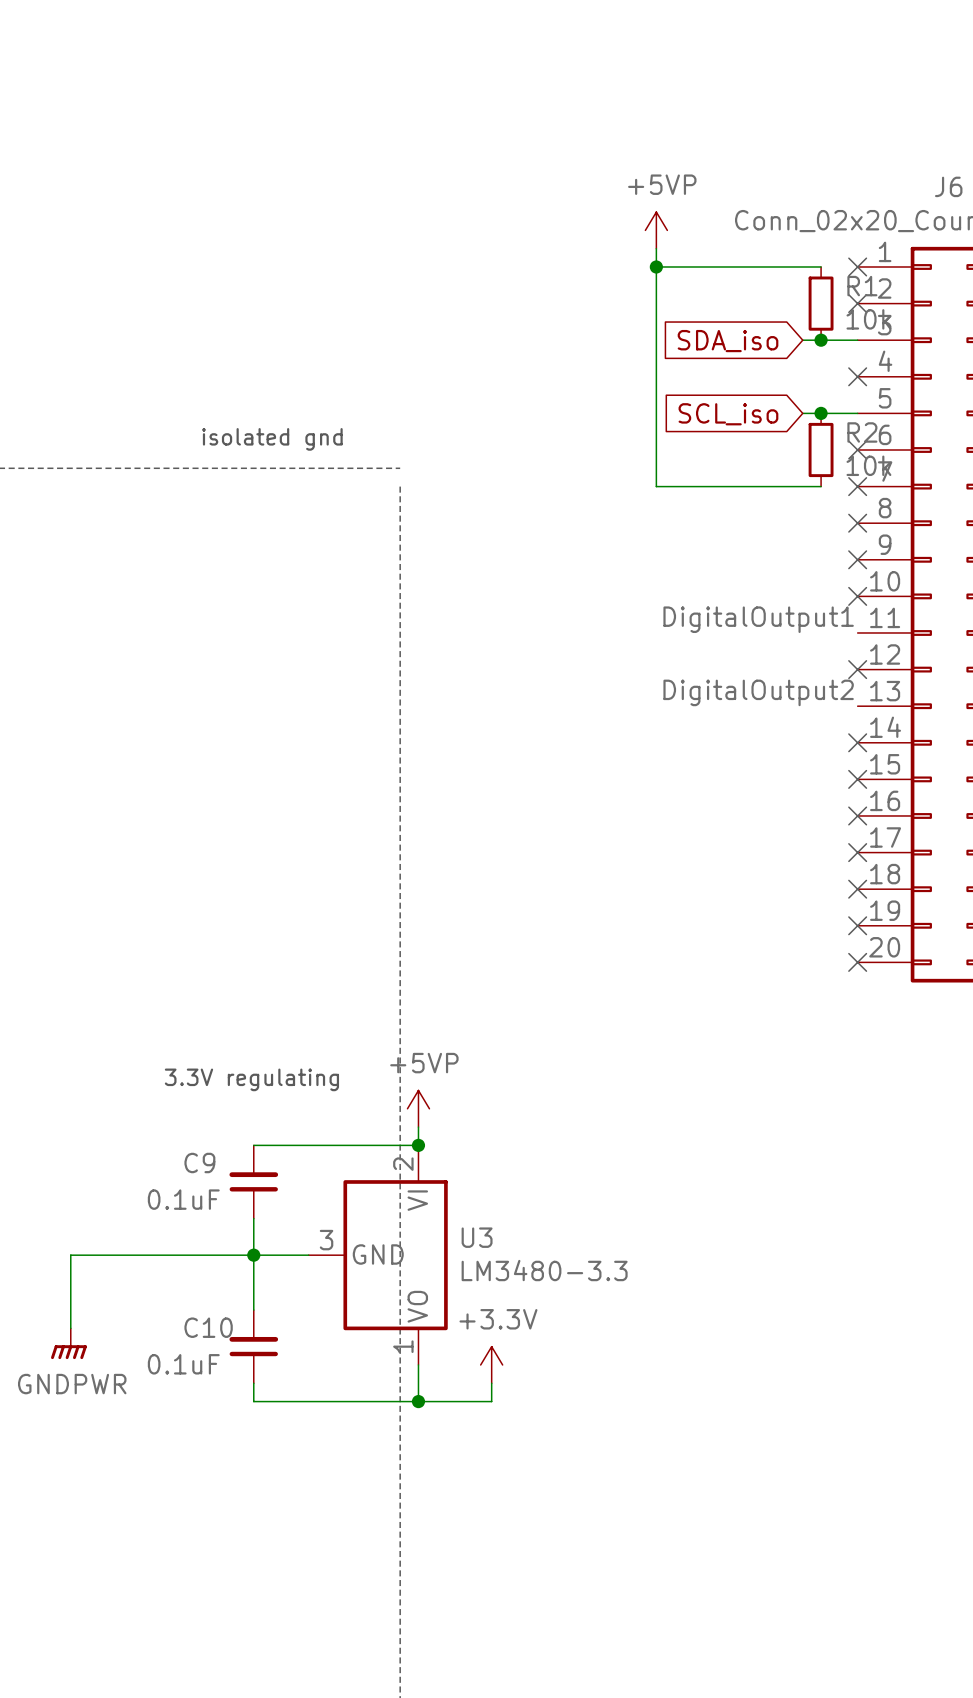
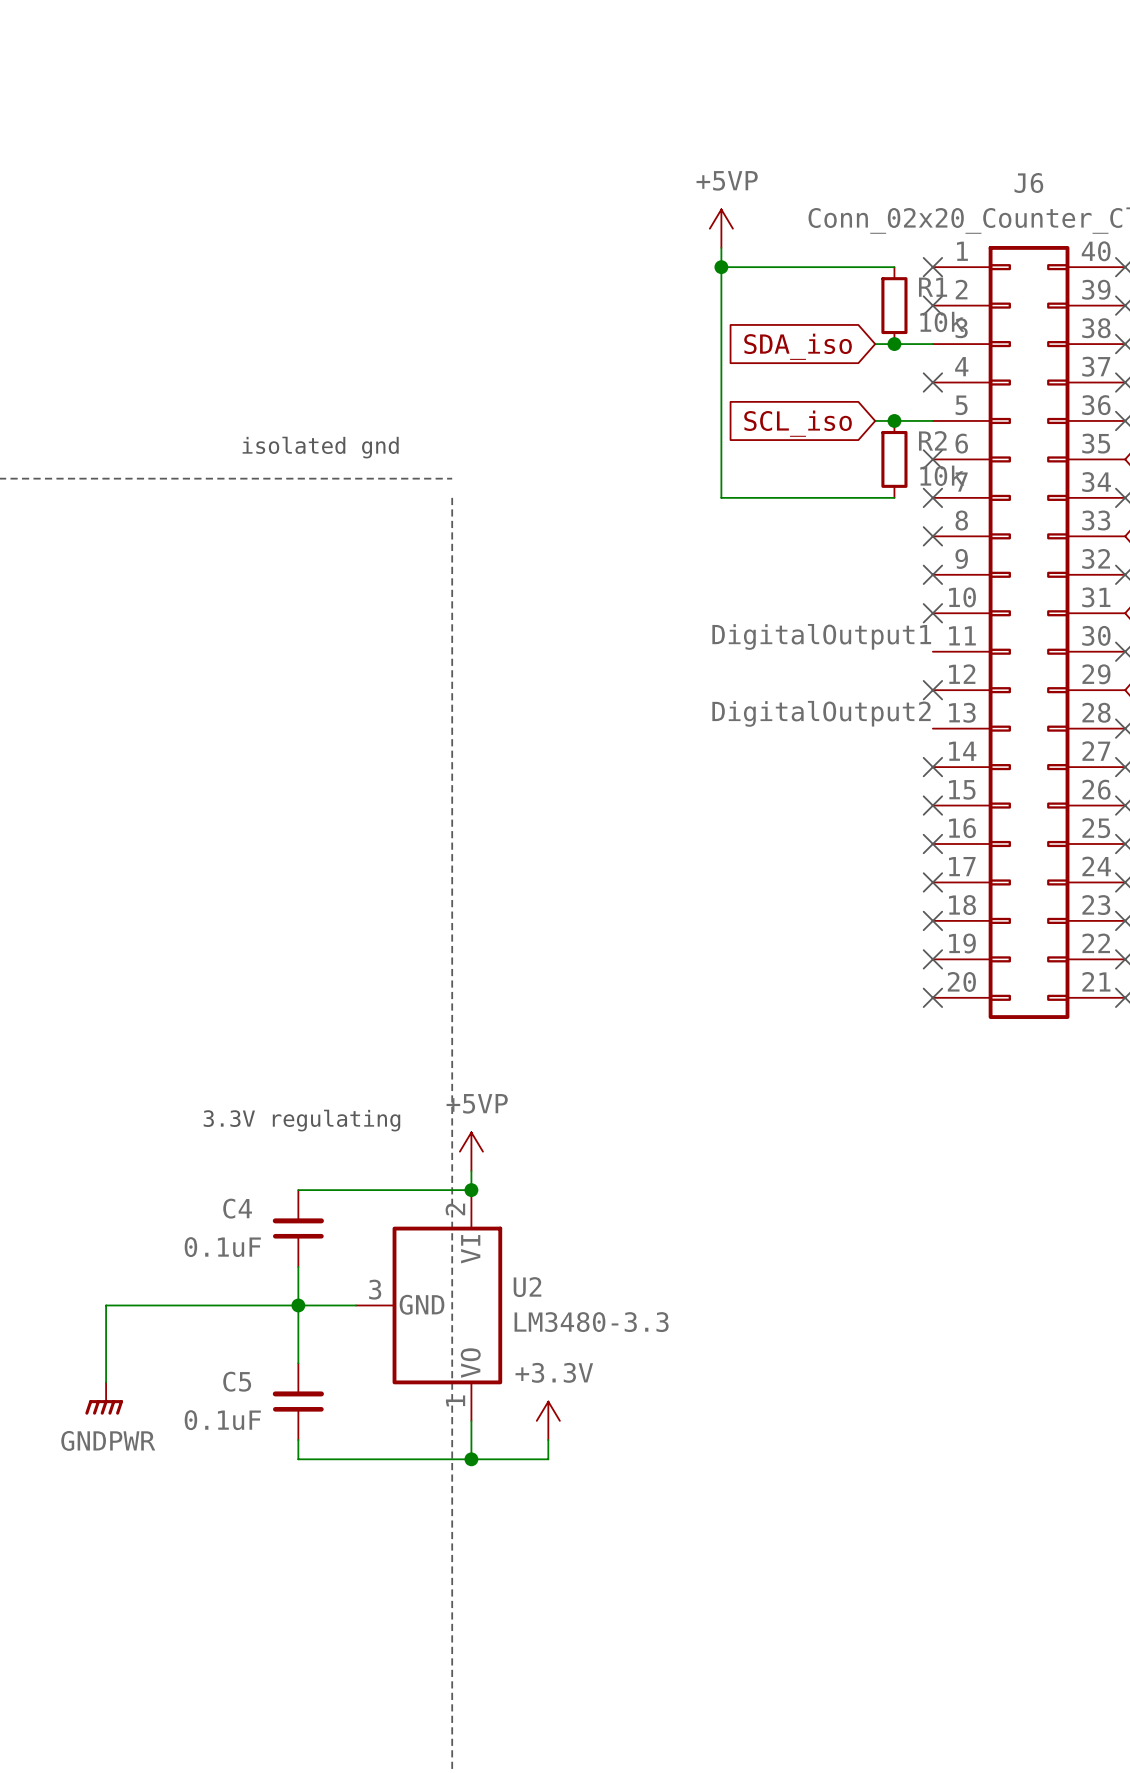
C9 name: C9 (199, 1163) -> C4 (237, 1208)
U3 name: U3 (477, 1237) -> U2 (527, 1287)
C10 name: C10 (208, 1327) -> C5 (237, 1381)

